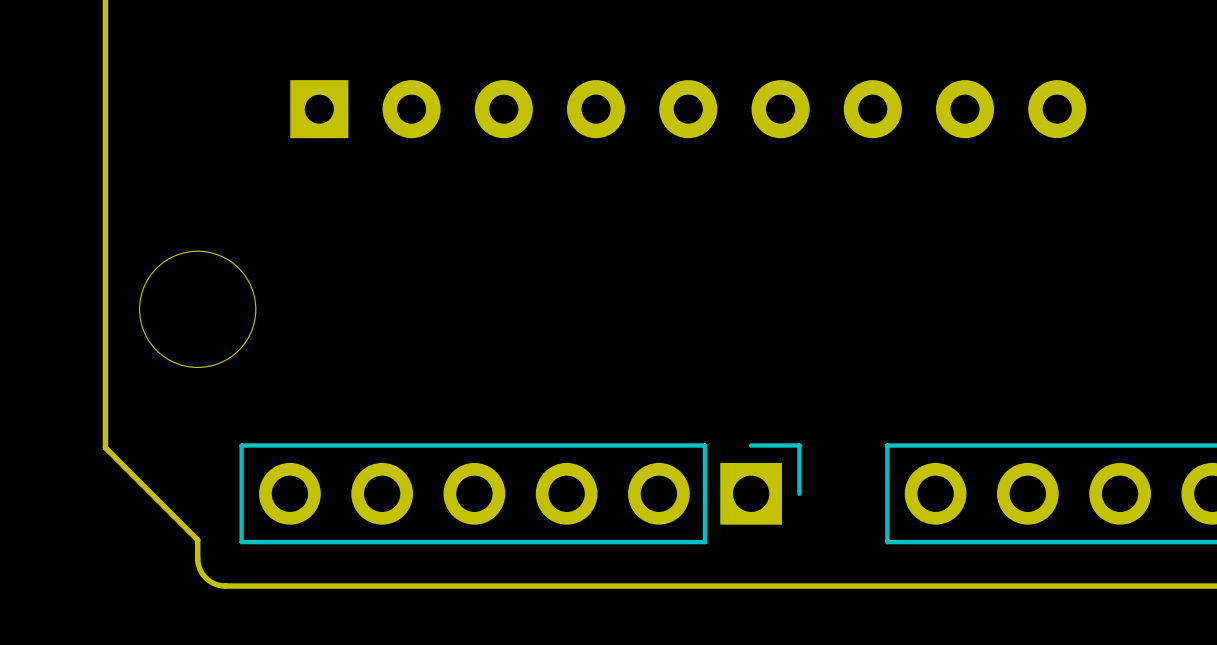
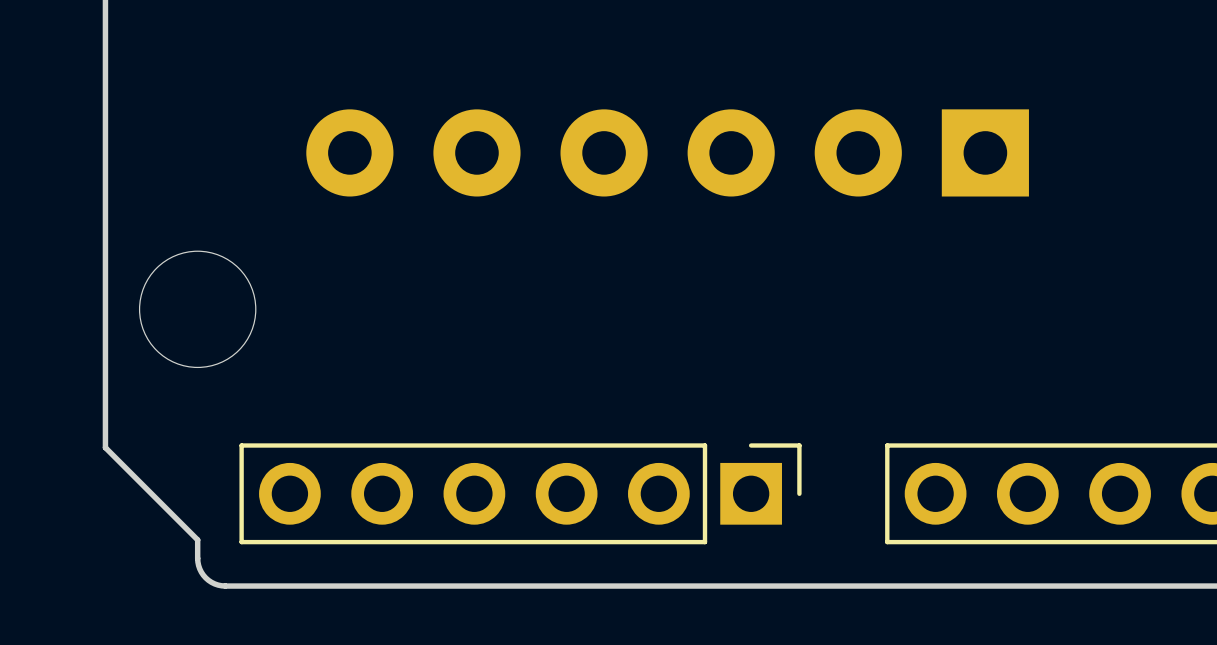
part: (688, 109) -> none
part: none -> (667, 152)

